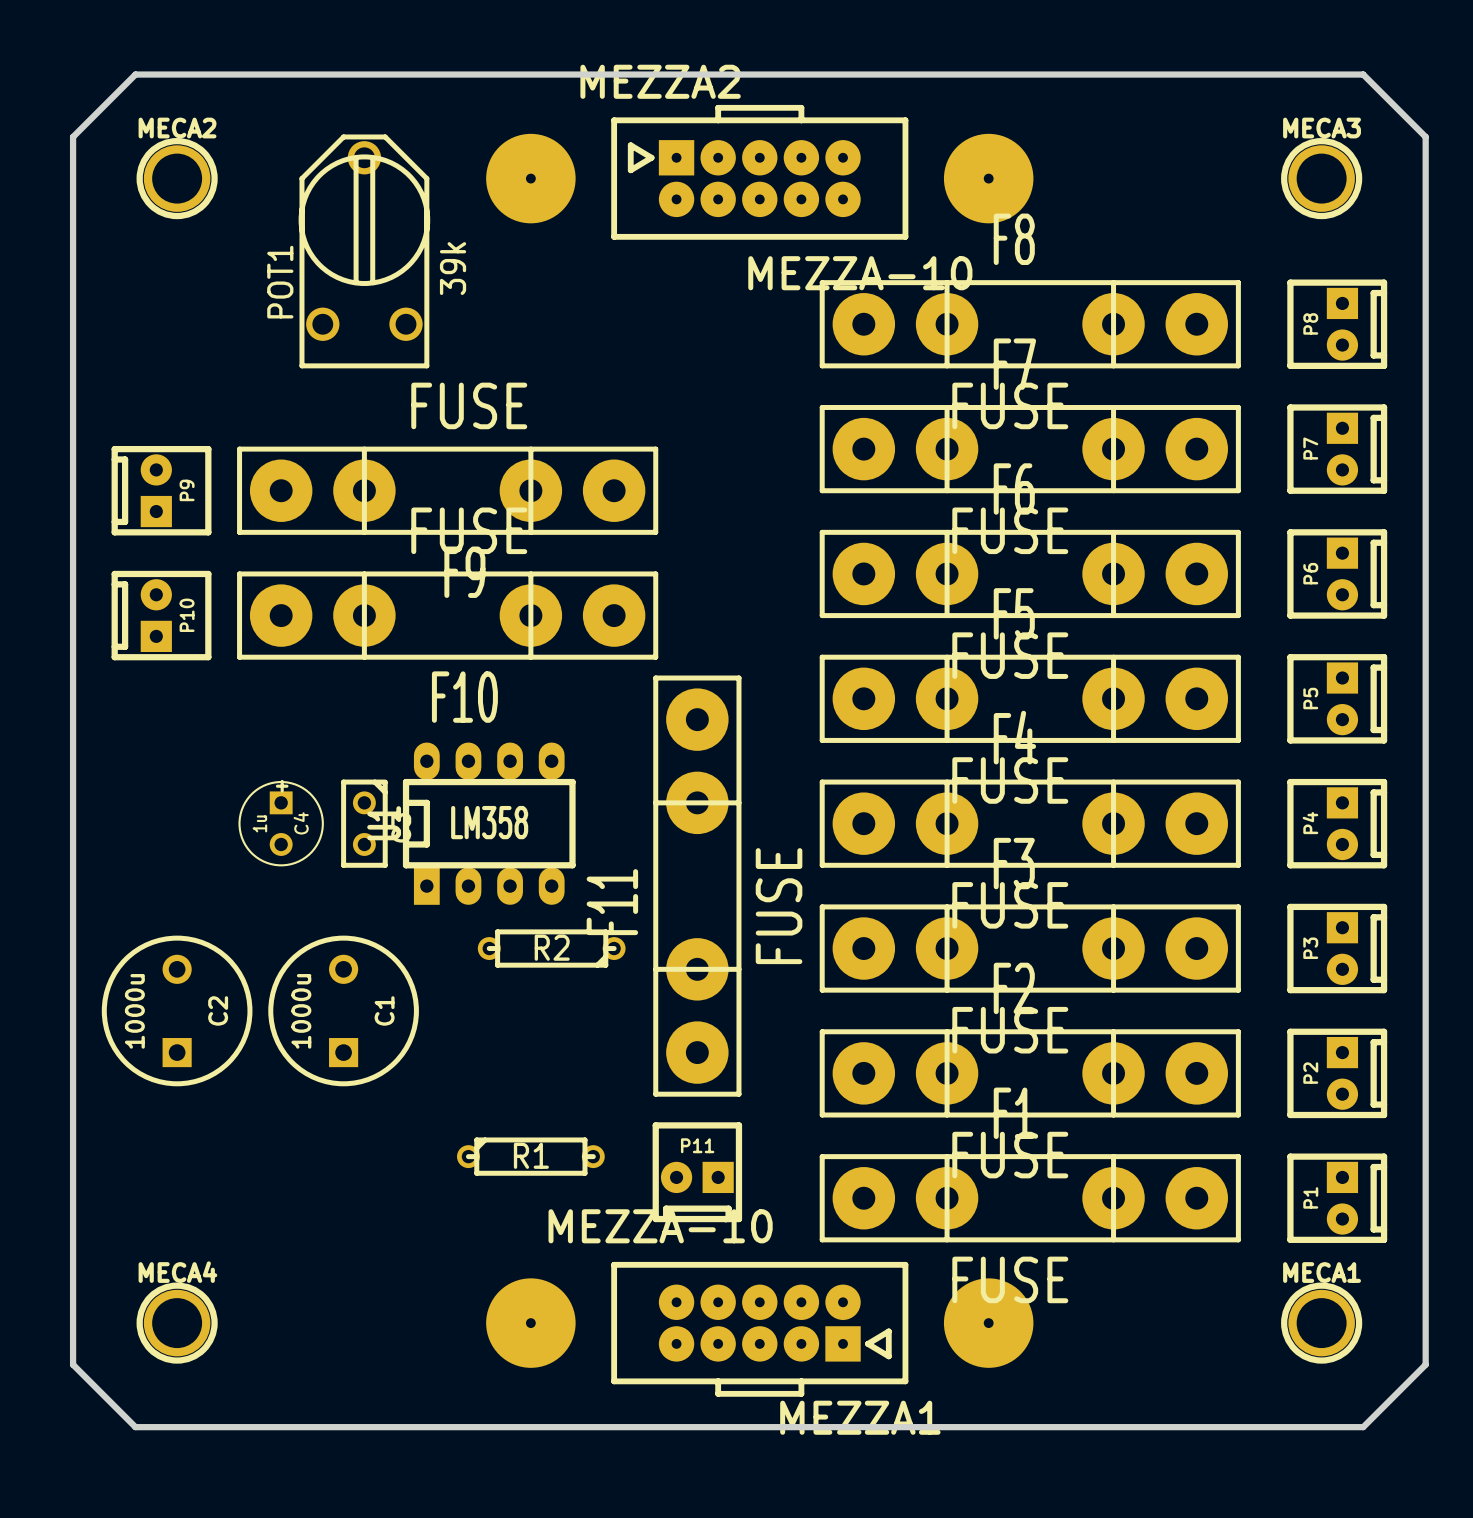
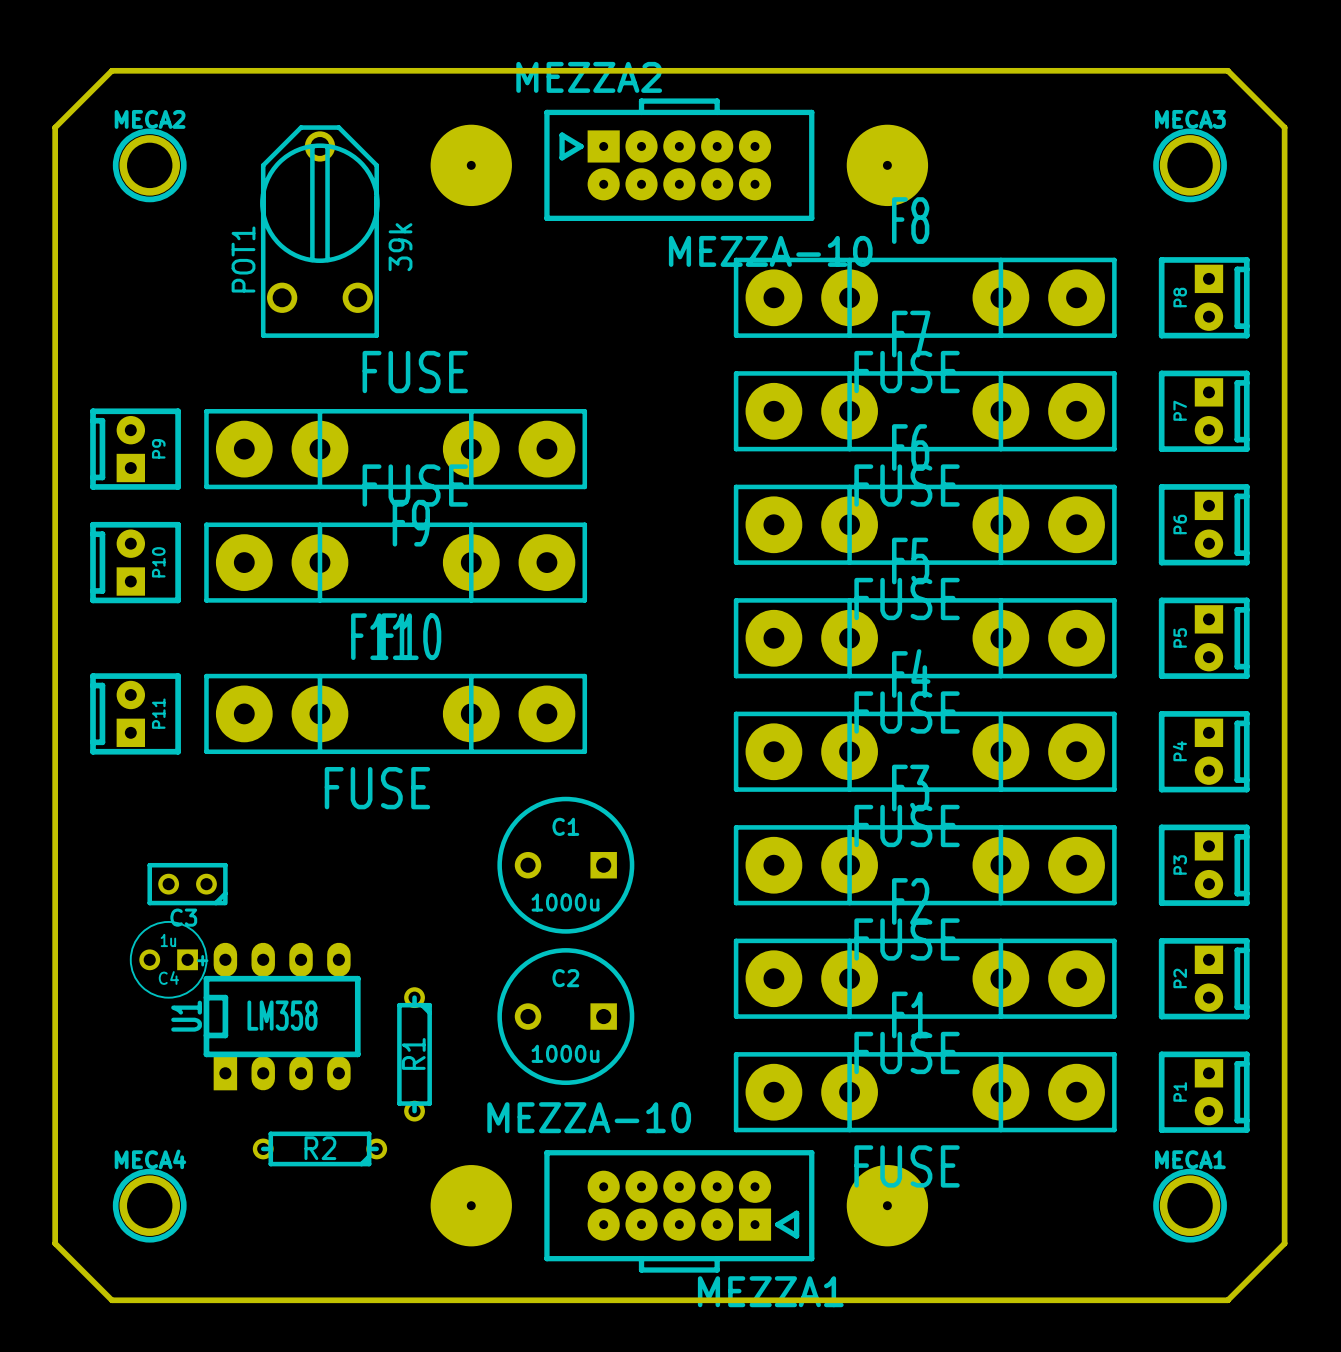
C4 rotation: 0° (281, 823) -> 90° clockwise (168, 959)
C4 position: (281, 823) -> (168, 959)
C3 rotation: 0° (364, 823) -> 90° clockwise (187, 884)
C3 position: (364, 823) -> (187, 884)
U1 position: (489, 823) -> (282, 1016)
F11 rotation: 0° (697, 886) -> 90° clockwise (395, 713)
F11 position: (697, 886) -> (395, 713)
R2 position: (551, 948) -> (319, 1148)
C2 rotation: 0° (177, 1010) -> 90° counterclockwise (565, 1016)
C2 position: (177, 1010) -> (565, 1016)
C1 rotation: 0° (343, 1010) -> 90° counterclockwise (565, 865)
C1 position: (343, 1010) -> (565, 865)
R1 rotation: 0° (530, 1156) -> 90° clockwise (414, 1054)
P11 rotation: 0° (697, 1172) -> 90° clockwise (135, 713)
P11 position: (697, 1172) -> (135, 713)

